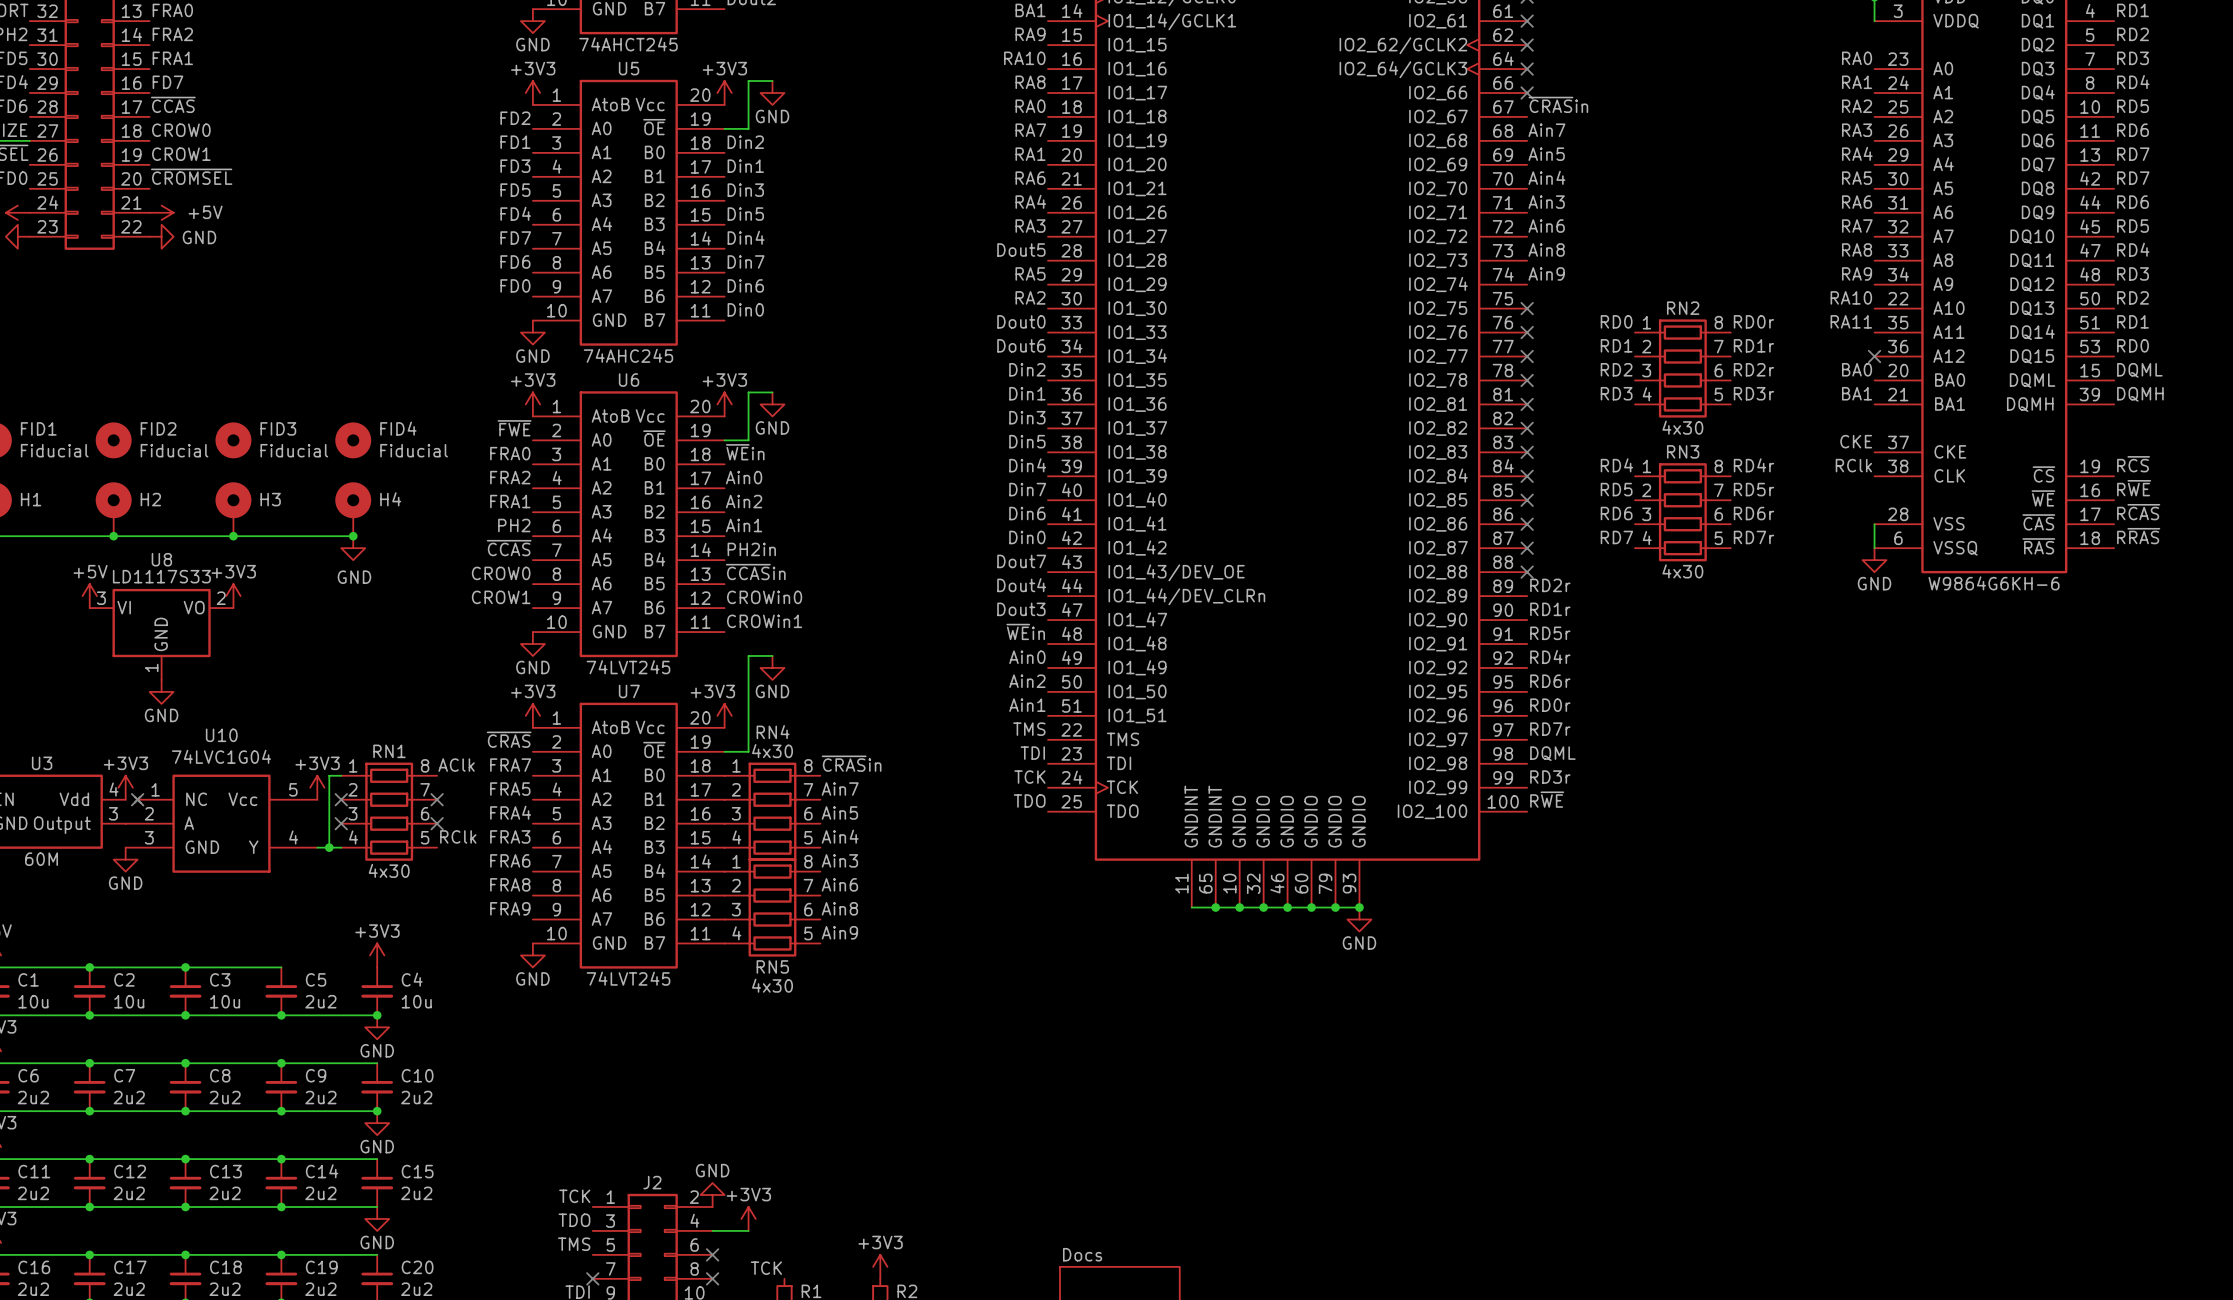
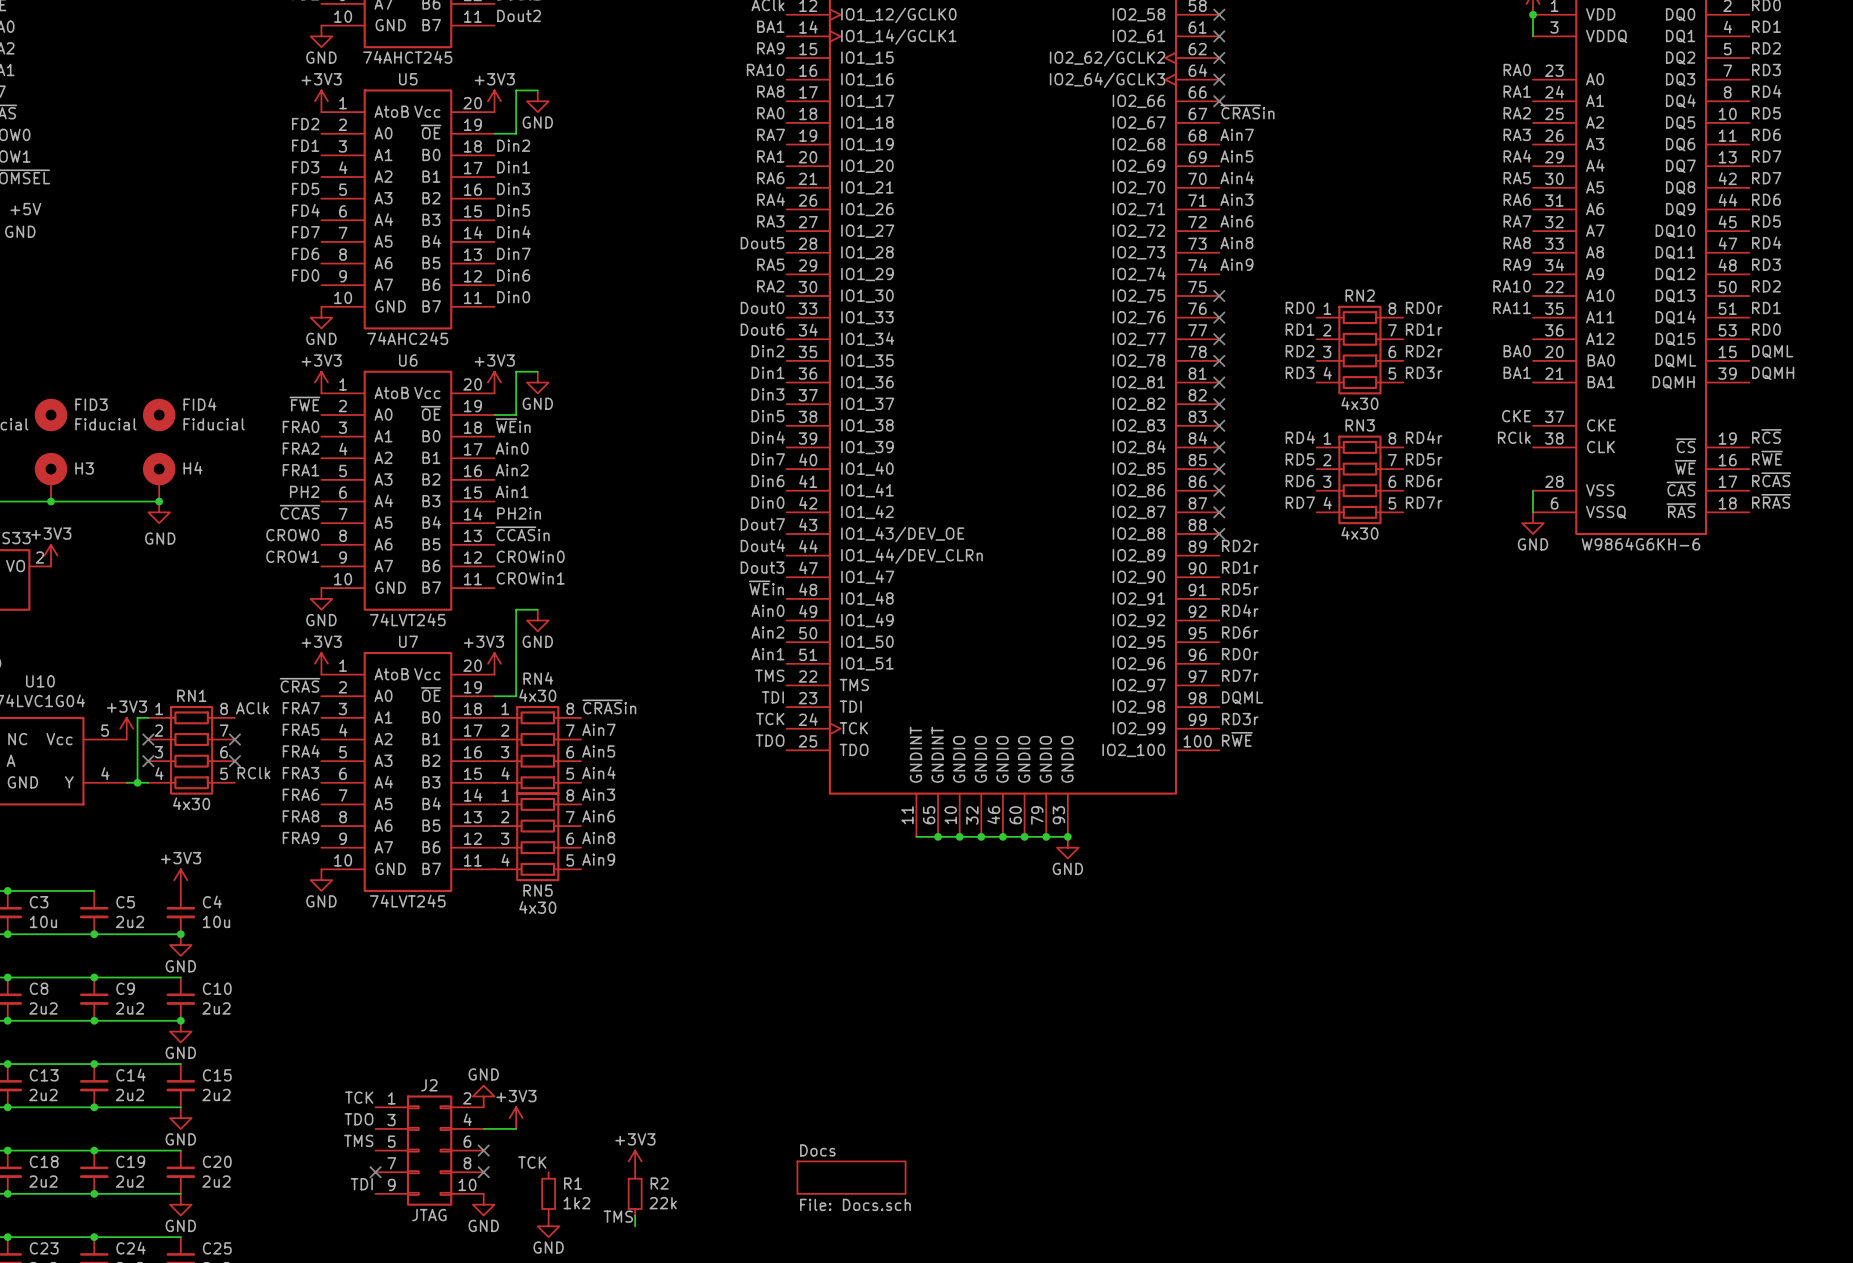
no-connect mark: (1874, 356) -> none

